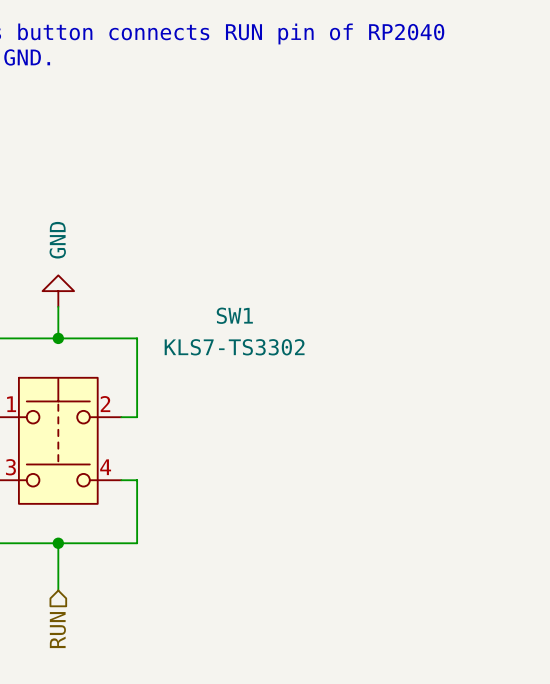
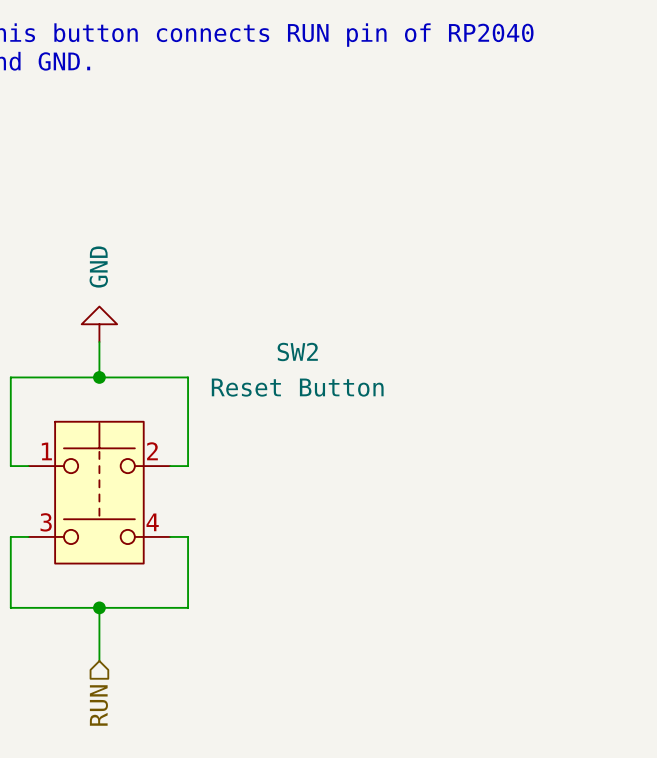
SW1 name: SW1 (234, 315) -> SW2 (297, 351)
SW1 value: KLS7-TS3302 (234, 347) -> Reset Button (297, 387)

